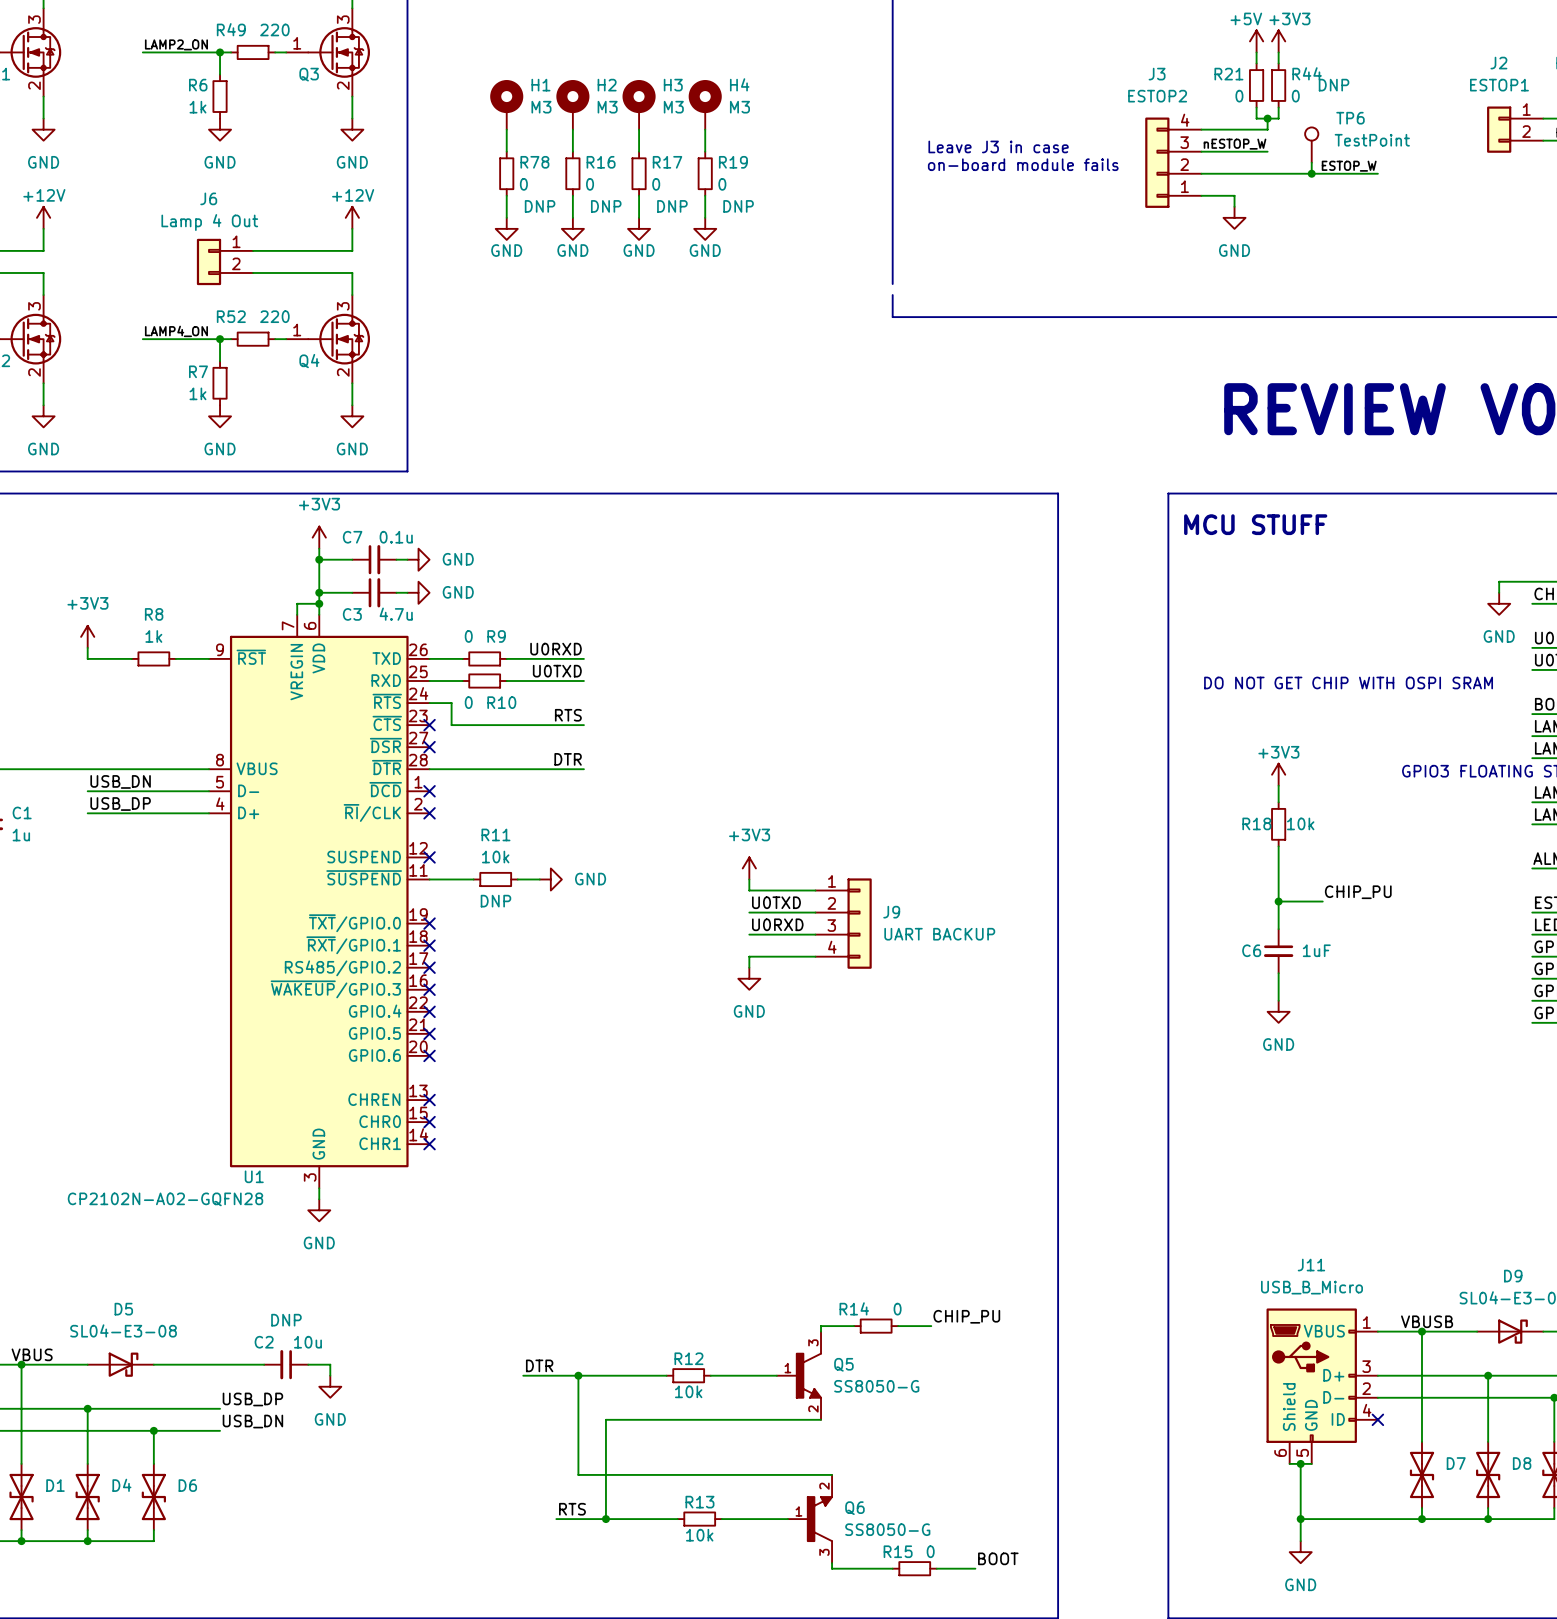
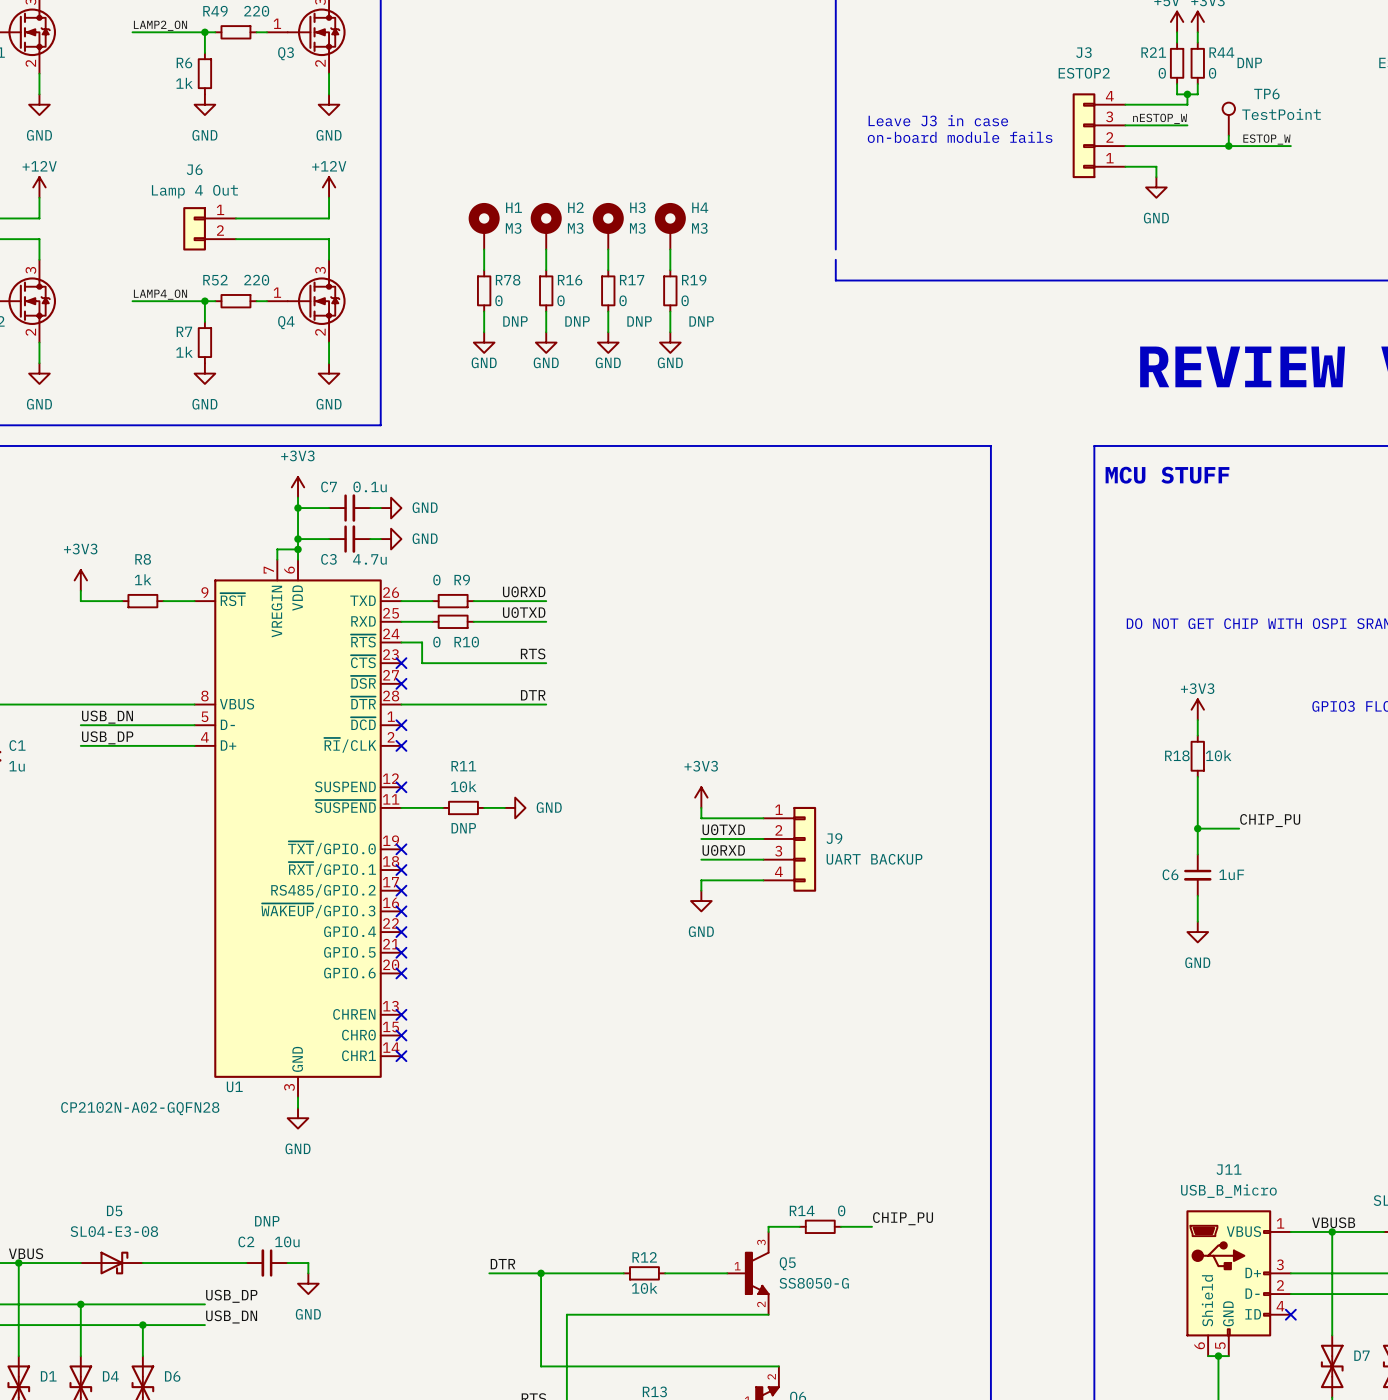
H1 position: (506, 104) -> (484, 226)
H2 position: (572, 104) -> (546, 226)
H3 position: (639, 104) -> (608, 226)
H4 position: (705, 104) -> (670, 226)
wire: (506, 129) (506, 151) -> (484, 249) (484, 270)
wire: (572, 129) (572, 151) -> (546, 249) (546, 270)
wire: (639, 129) (639, 151) -> (608, 249) (608, 270)
wire: (705, 129) (705, 151) -> (670, 249) (670, 270)
R78 position: (506, 173) -> (484, 290)
R16 position: (572, 173) -> (546, 290)
R17 position: (639, 173) -> (608, 290)
R19 position: (705, 173) -> (670, 290)
wire: (506, 195) (506, 217) -> (484, 311) (484, 332)
wire: (572, 195) (572, 217) -> (546, 311) (546, 332)
wire: (639, 195) (639, 217) -> (608, 311) (608, 332)
wire: (705, 195) (705, 217) -> (670, 311) (670, 332)
power symbol: GND (506, 228) -> none
power symbol: GND (572, 228) -> none
power symbol: GND (639, 228) -> none
power symbol: GND (705, 228) -> none
power symbol: none -> GND (484, 342)
power symbol: none -> GND (546, 342)
power symbol: none -> GND (608, 342)
power symbol: none -> GND (670, 342)

